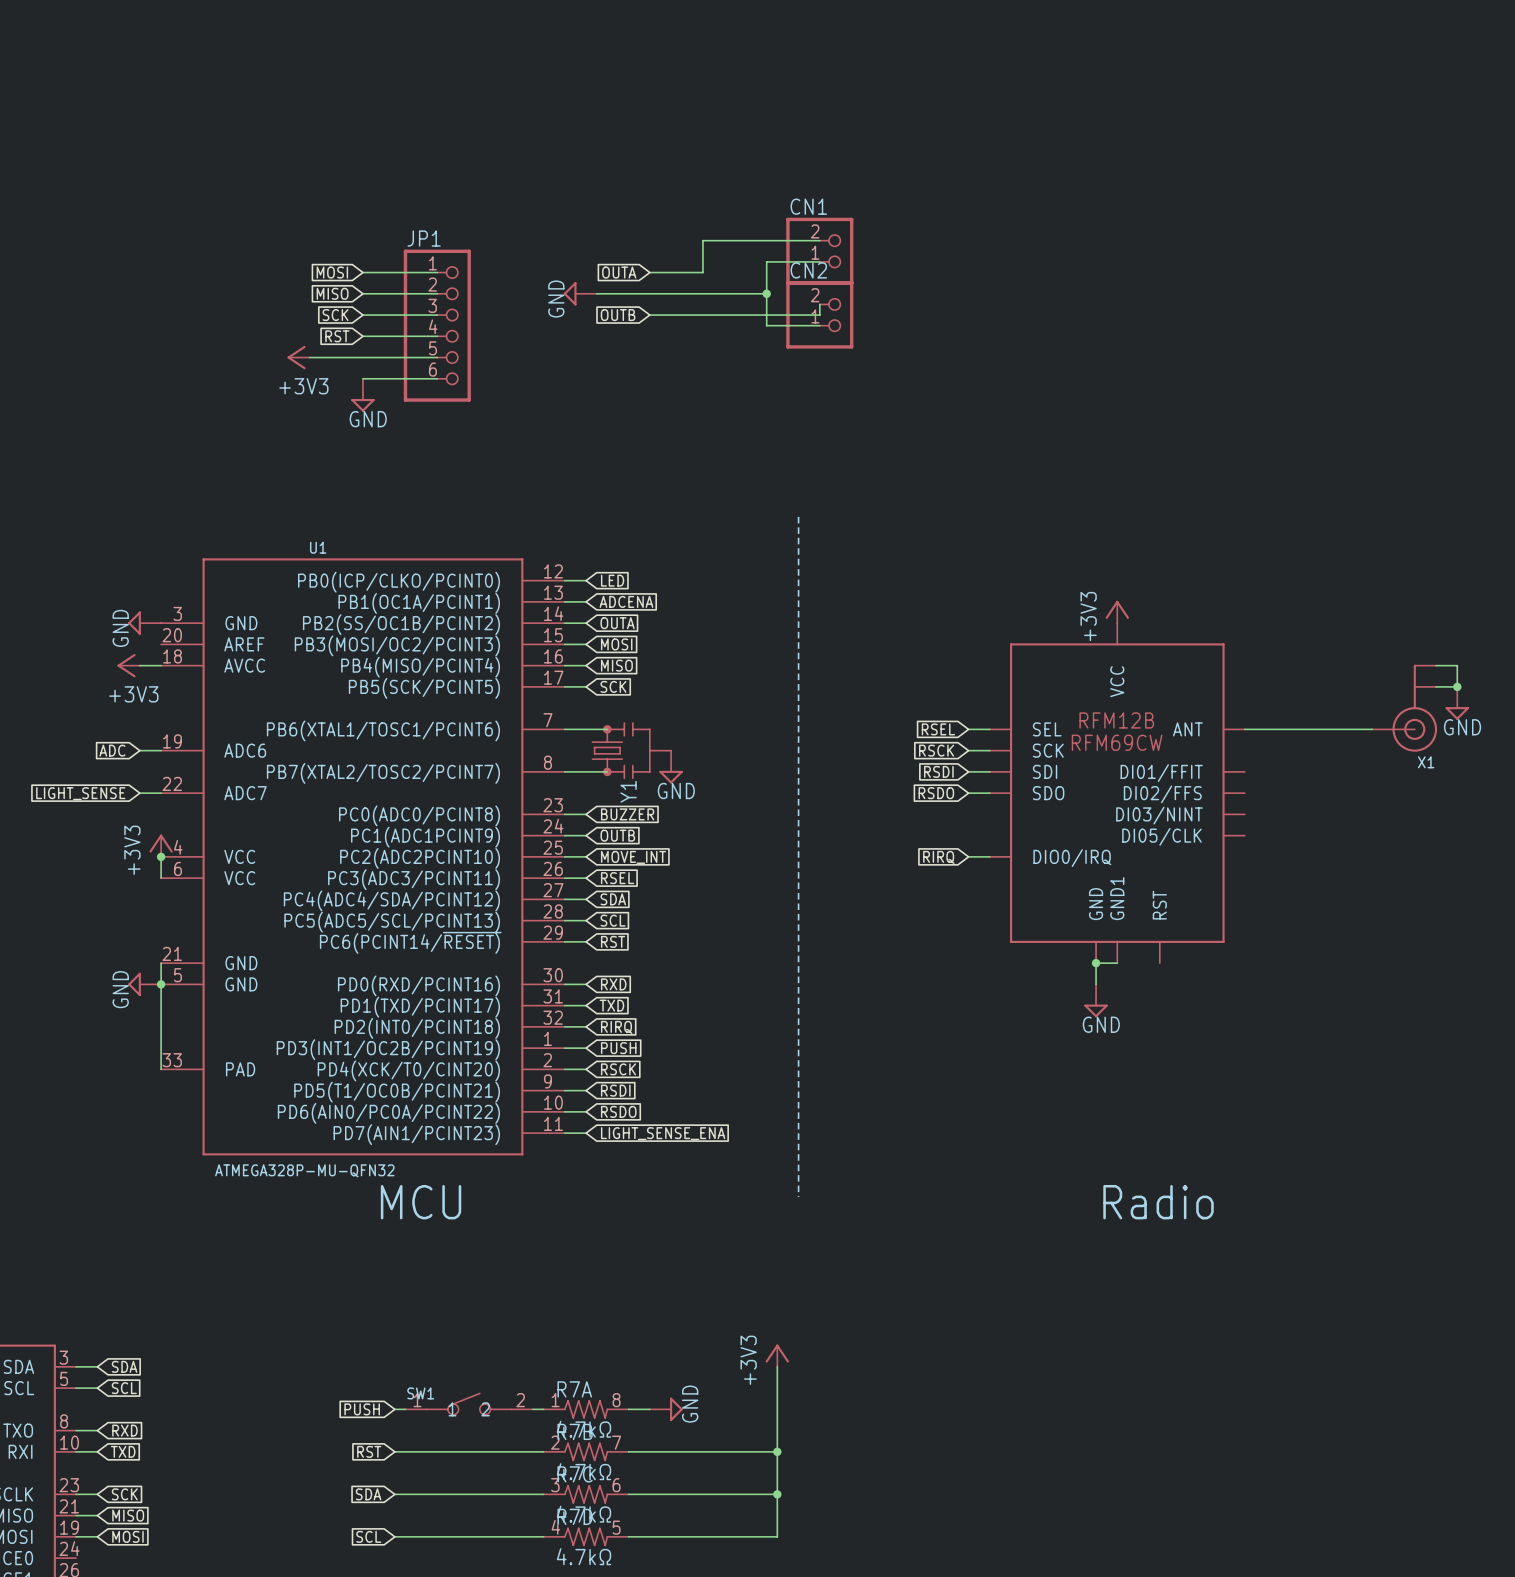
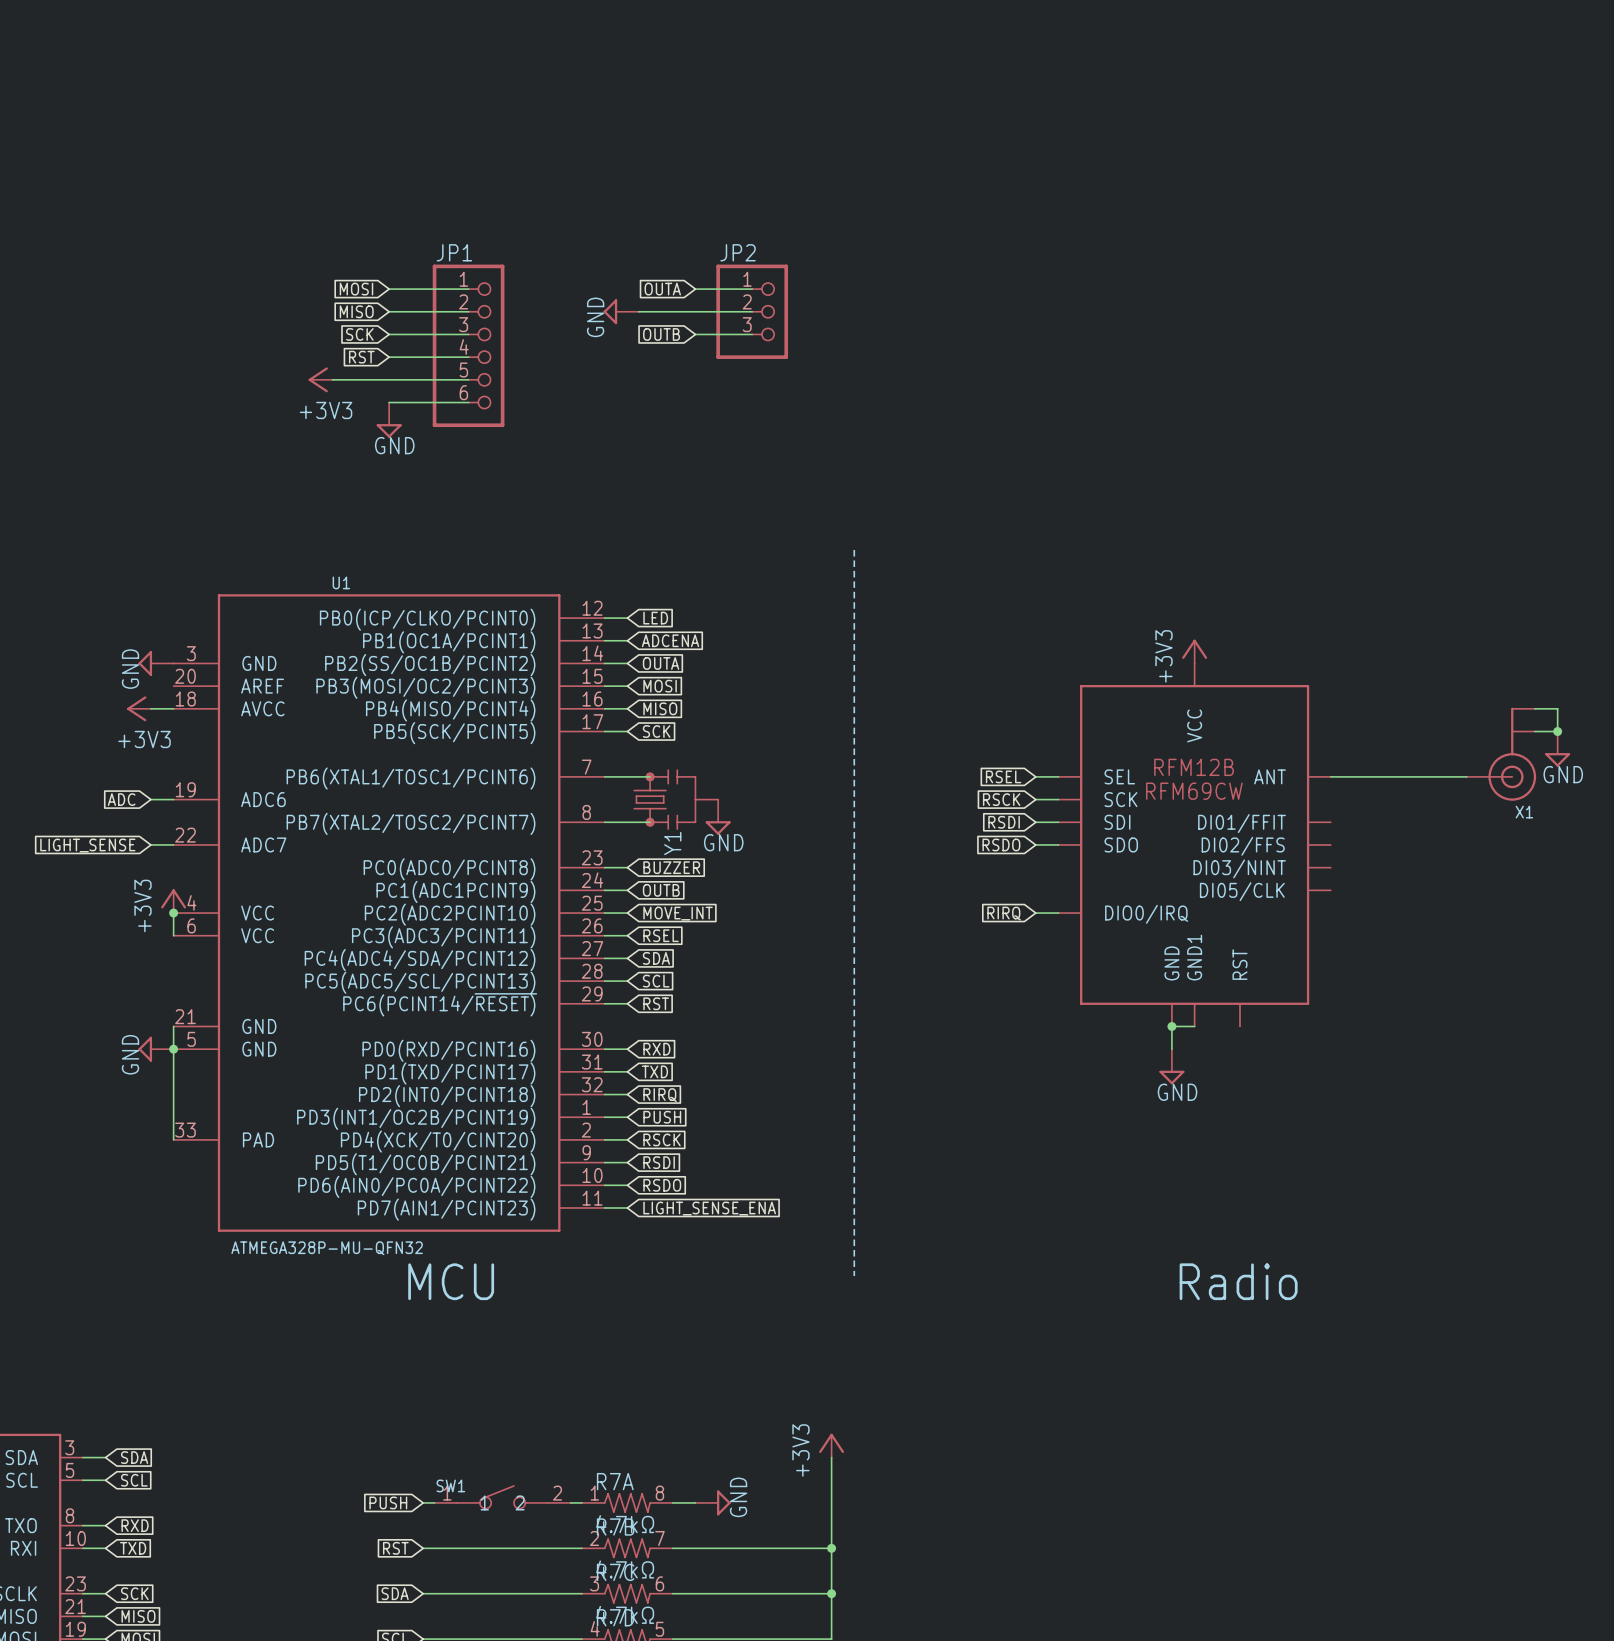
wire: (819, 240) (702, 240) (702, 272) -> none
CN1: (819, 251) -> none
wire: (819, 261) (766, 261) (766, 325) (819, 325) -> none
wire: (702, 293) (766, 293) -> none
JP2: none -> (752, 311)
junction: (766, 293) -> none
wire: (819, 304) (819, 315) (702, 315) -> none
CN2: (819, 315) -> none

